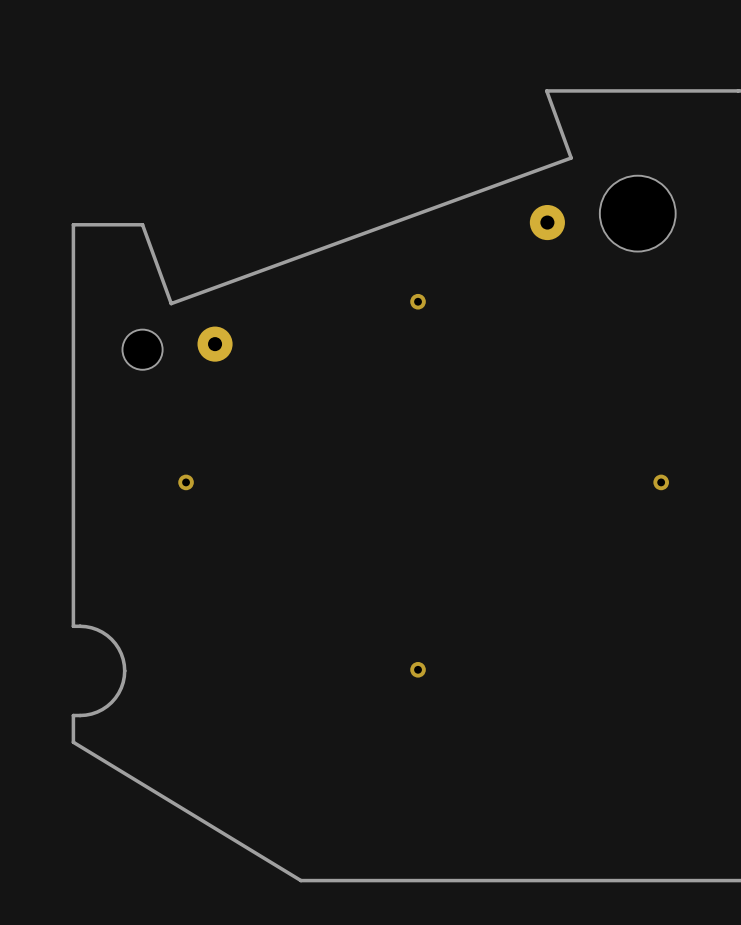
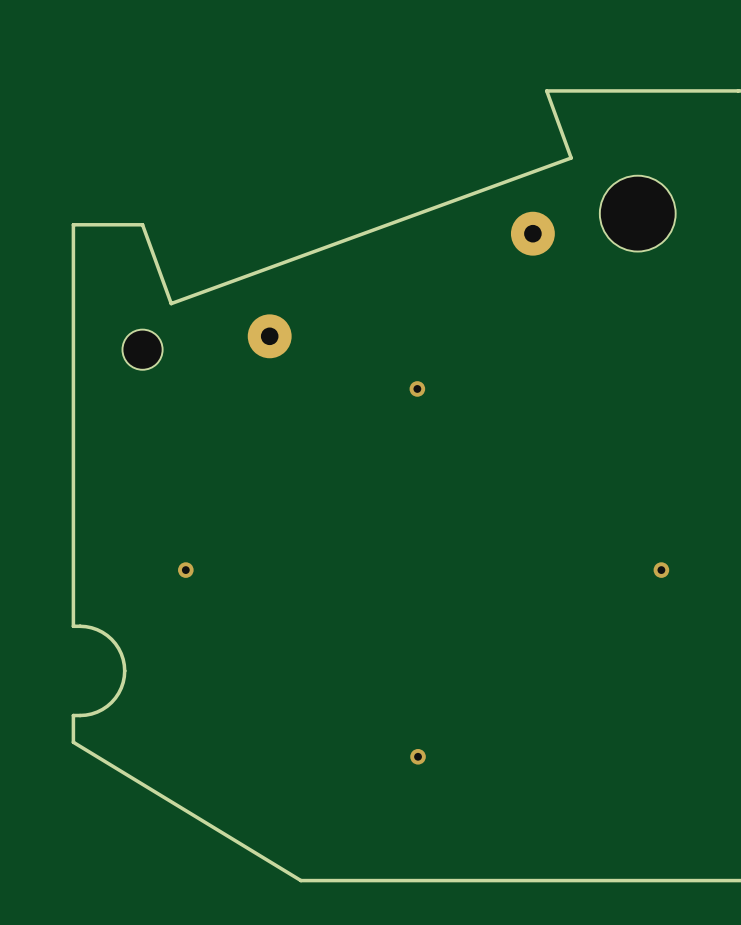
part: (547, 222) -> none
part: none -> (532, 233)
via position: (418, 301) -> (417, 388)
part: none -> (269, 336)
part: (215, 344) -> none
via position: (186, 482) -> (185, 570)
via position: (661, 482) -> (661, 570)
via position: (418, 669) -> (418, 756)

